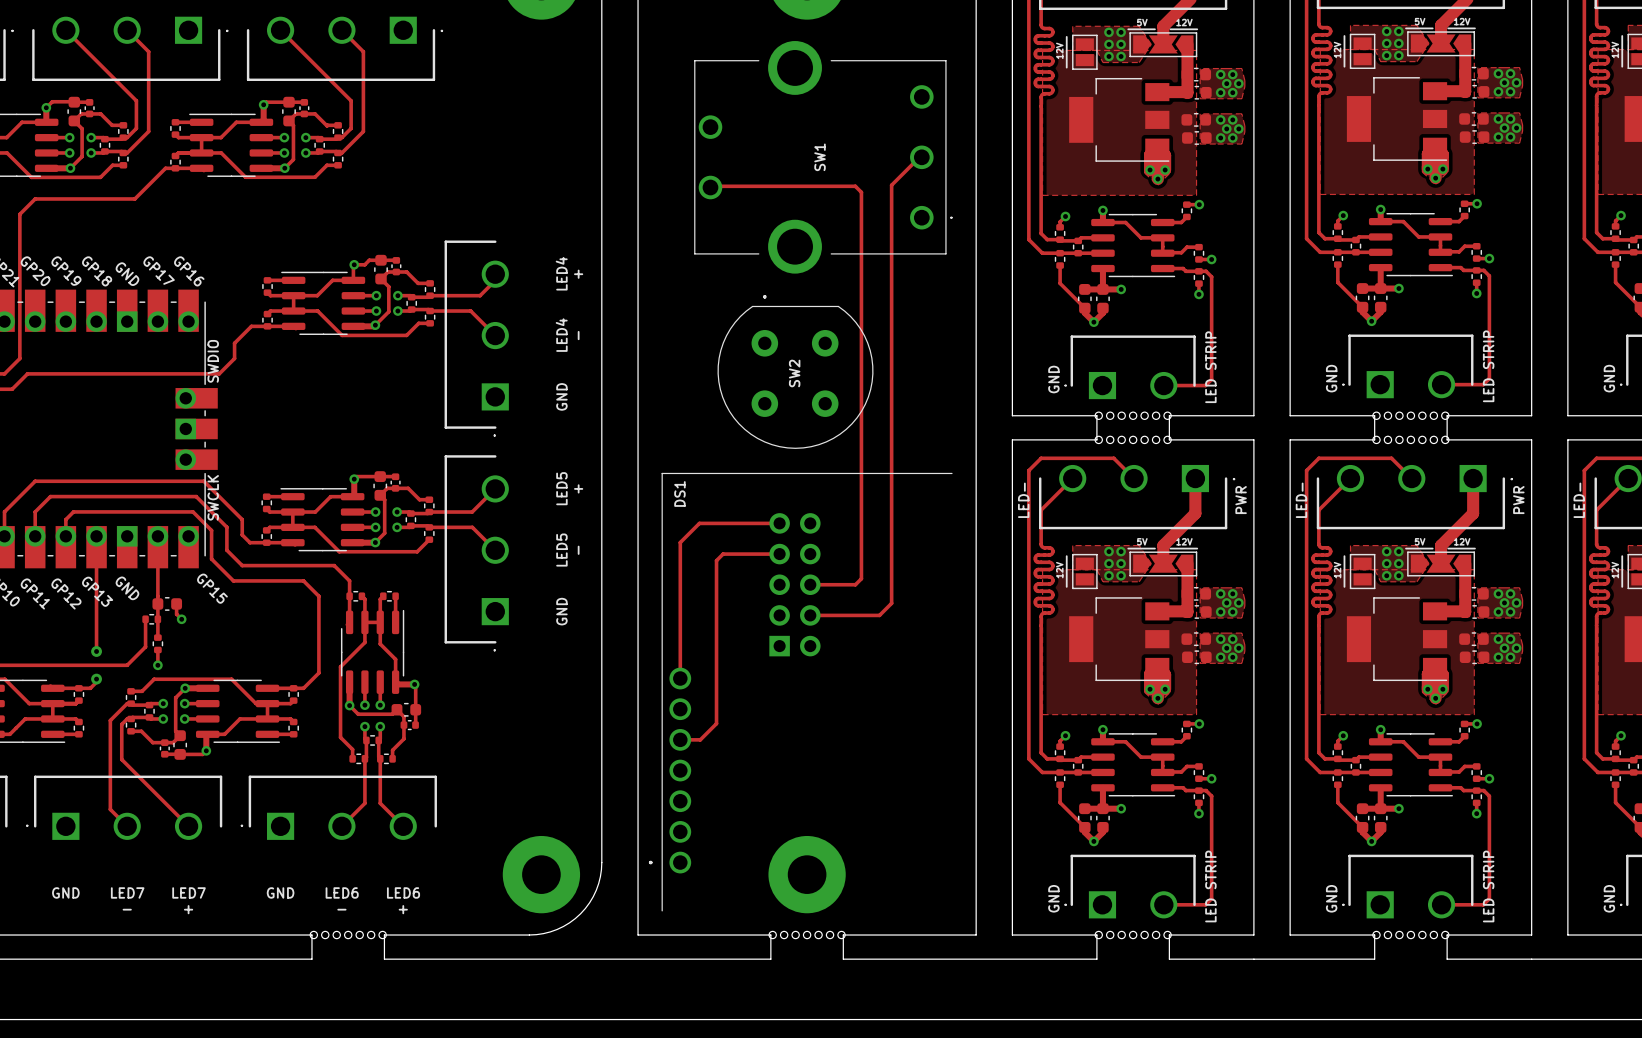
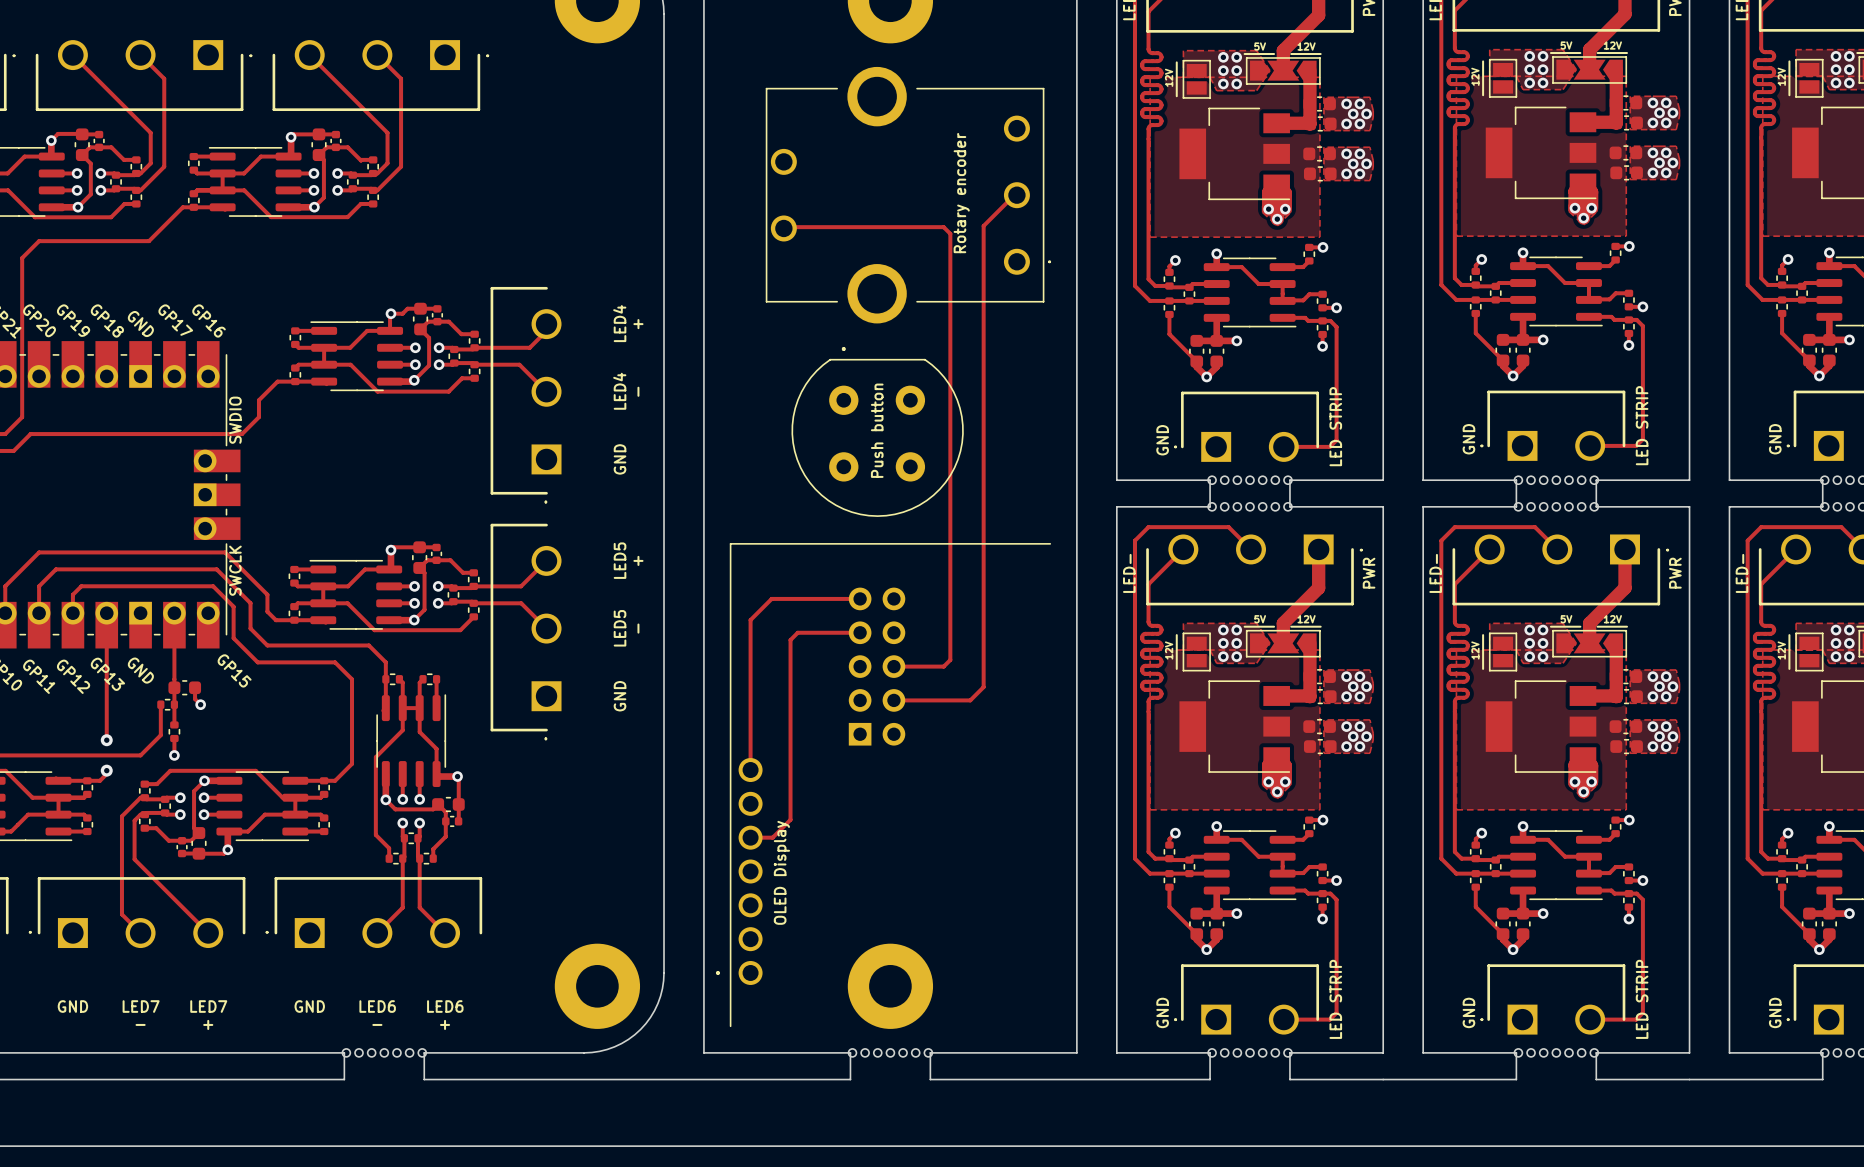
text: none -> Rotary encoder (961, 193)
SW1 name: SW1 (820, 157) -> none
text: none -> Push button (877, 430)
SW2 name: SW2 (794, 373) -> none
DS1 name: DS1 (679, 494) -> none
text: none -> OLED Display (781, 872)

